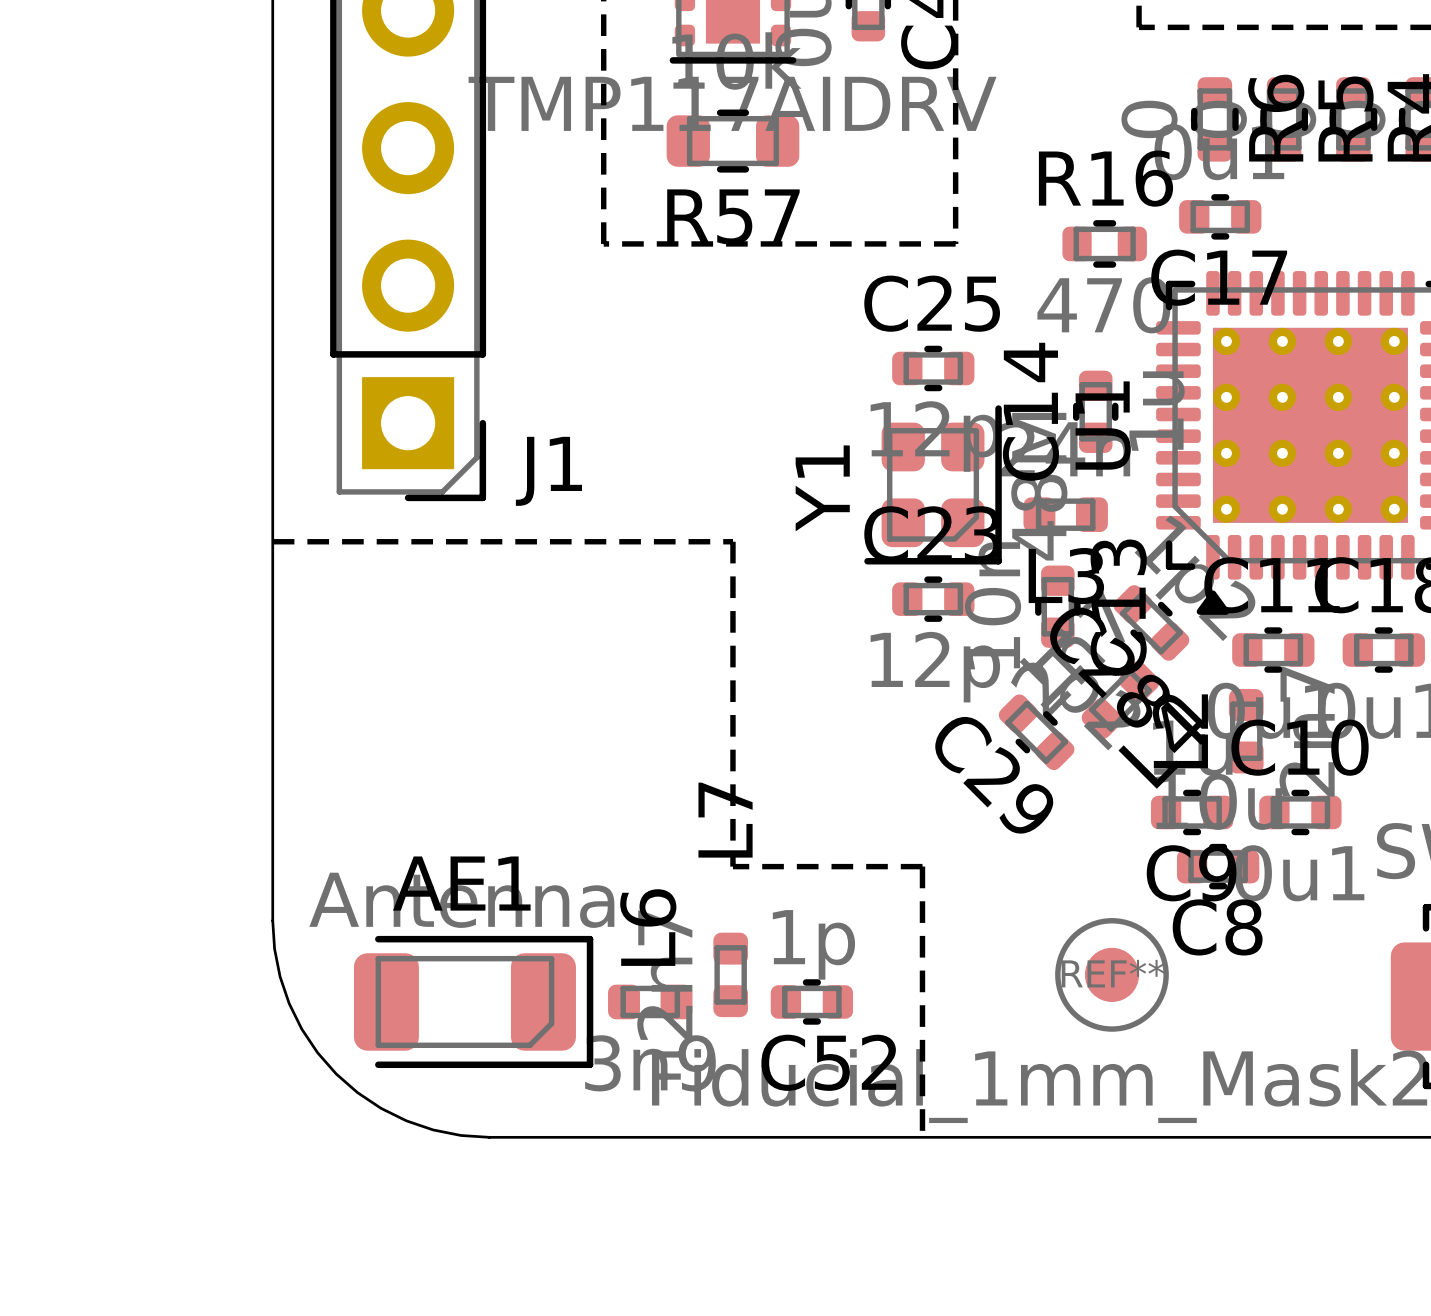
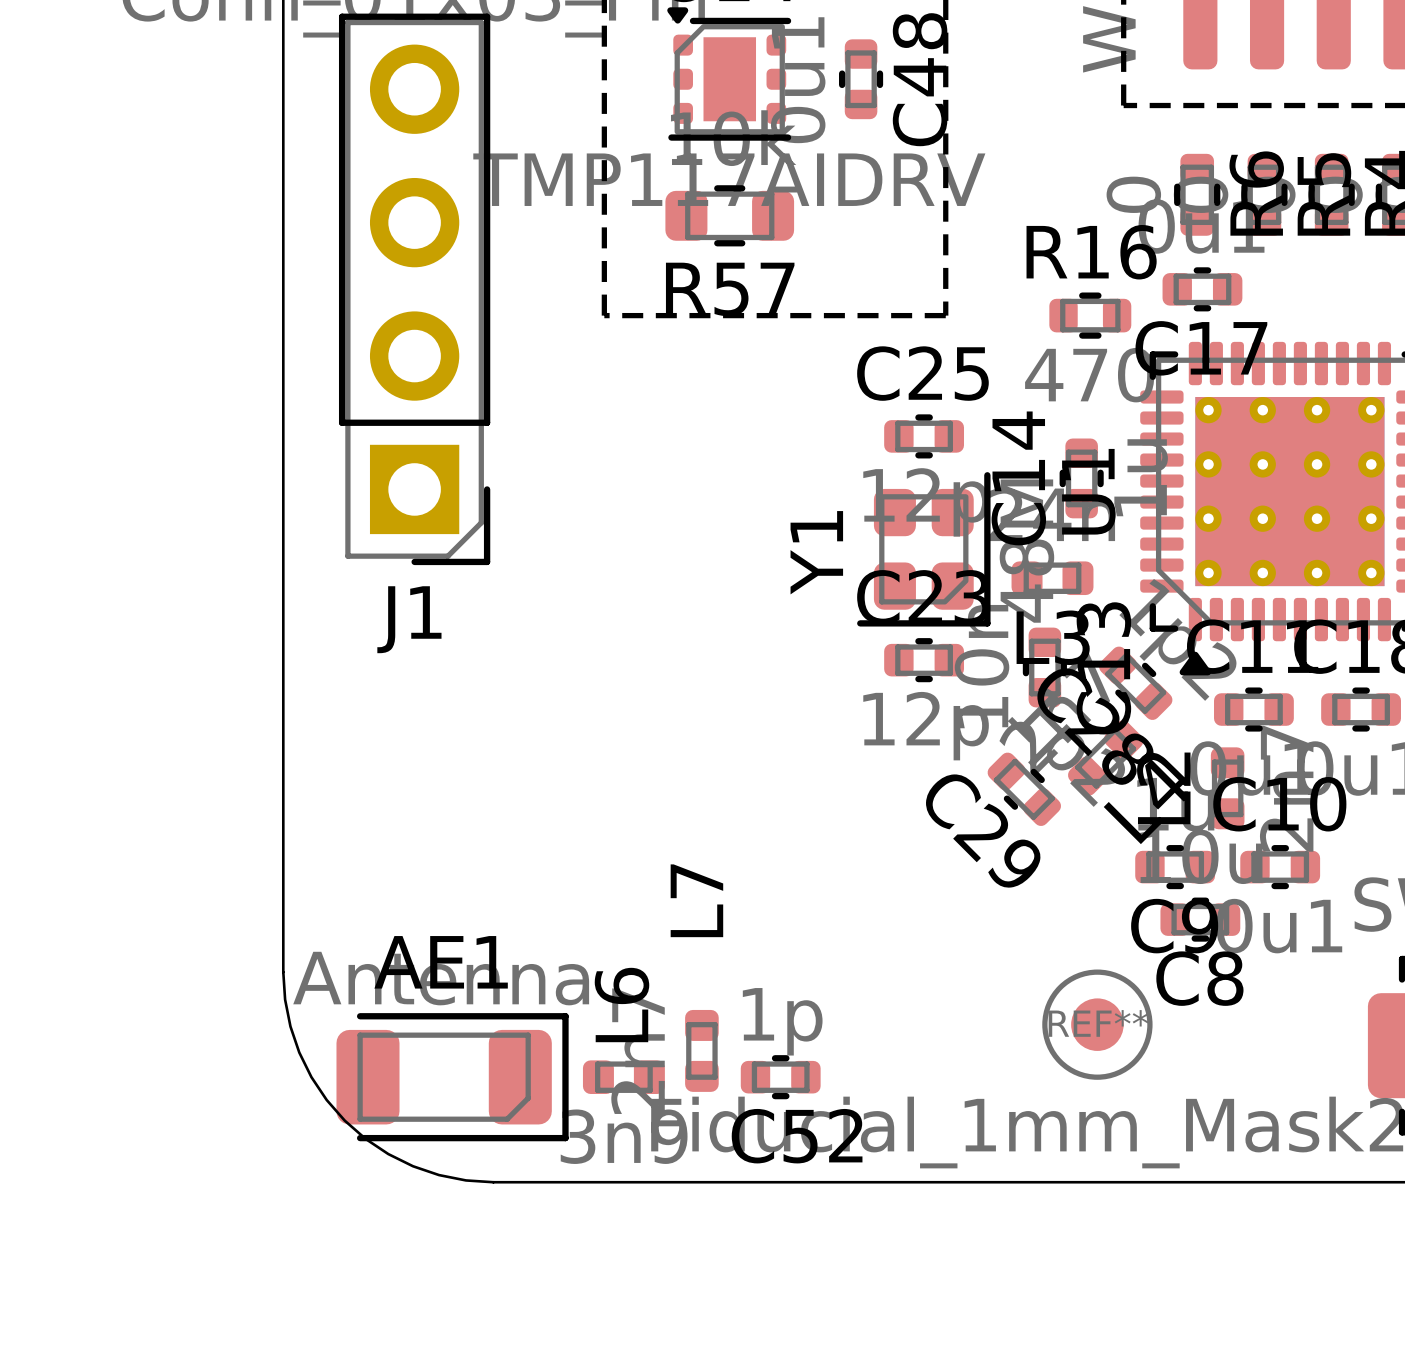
J1 name position: J1 (548, 471) -> J1 (409, 619)
line: (272, 541) (732, 541) (732, 866) (922, 866) (922, 1137) -> none
L7 position: (730, 974) -> (701, 1050)
AE1 position: (473, 1001) -> (452, 1077)
L6 position: (650, 1001) -> (623, 1077)
C52 position: (811, 1001) -> (780, 1077)

